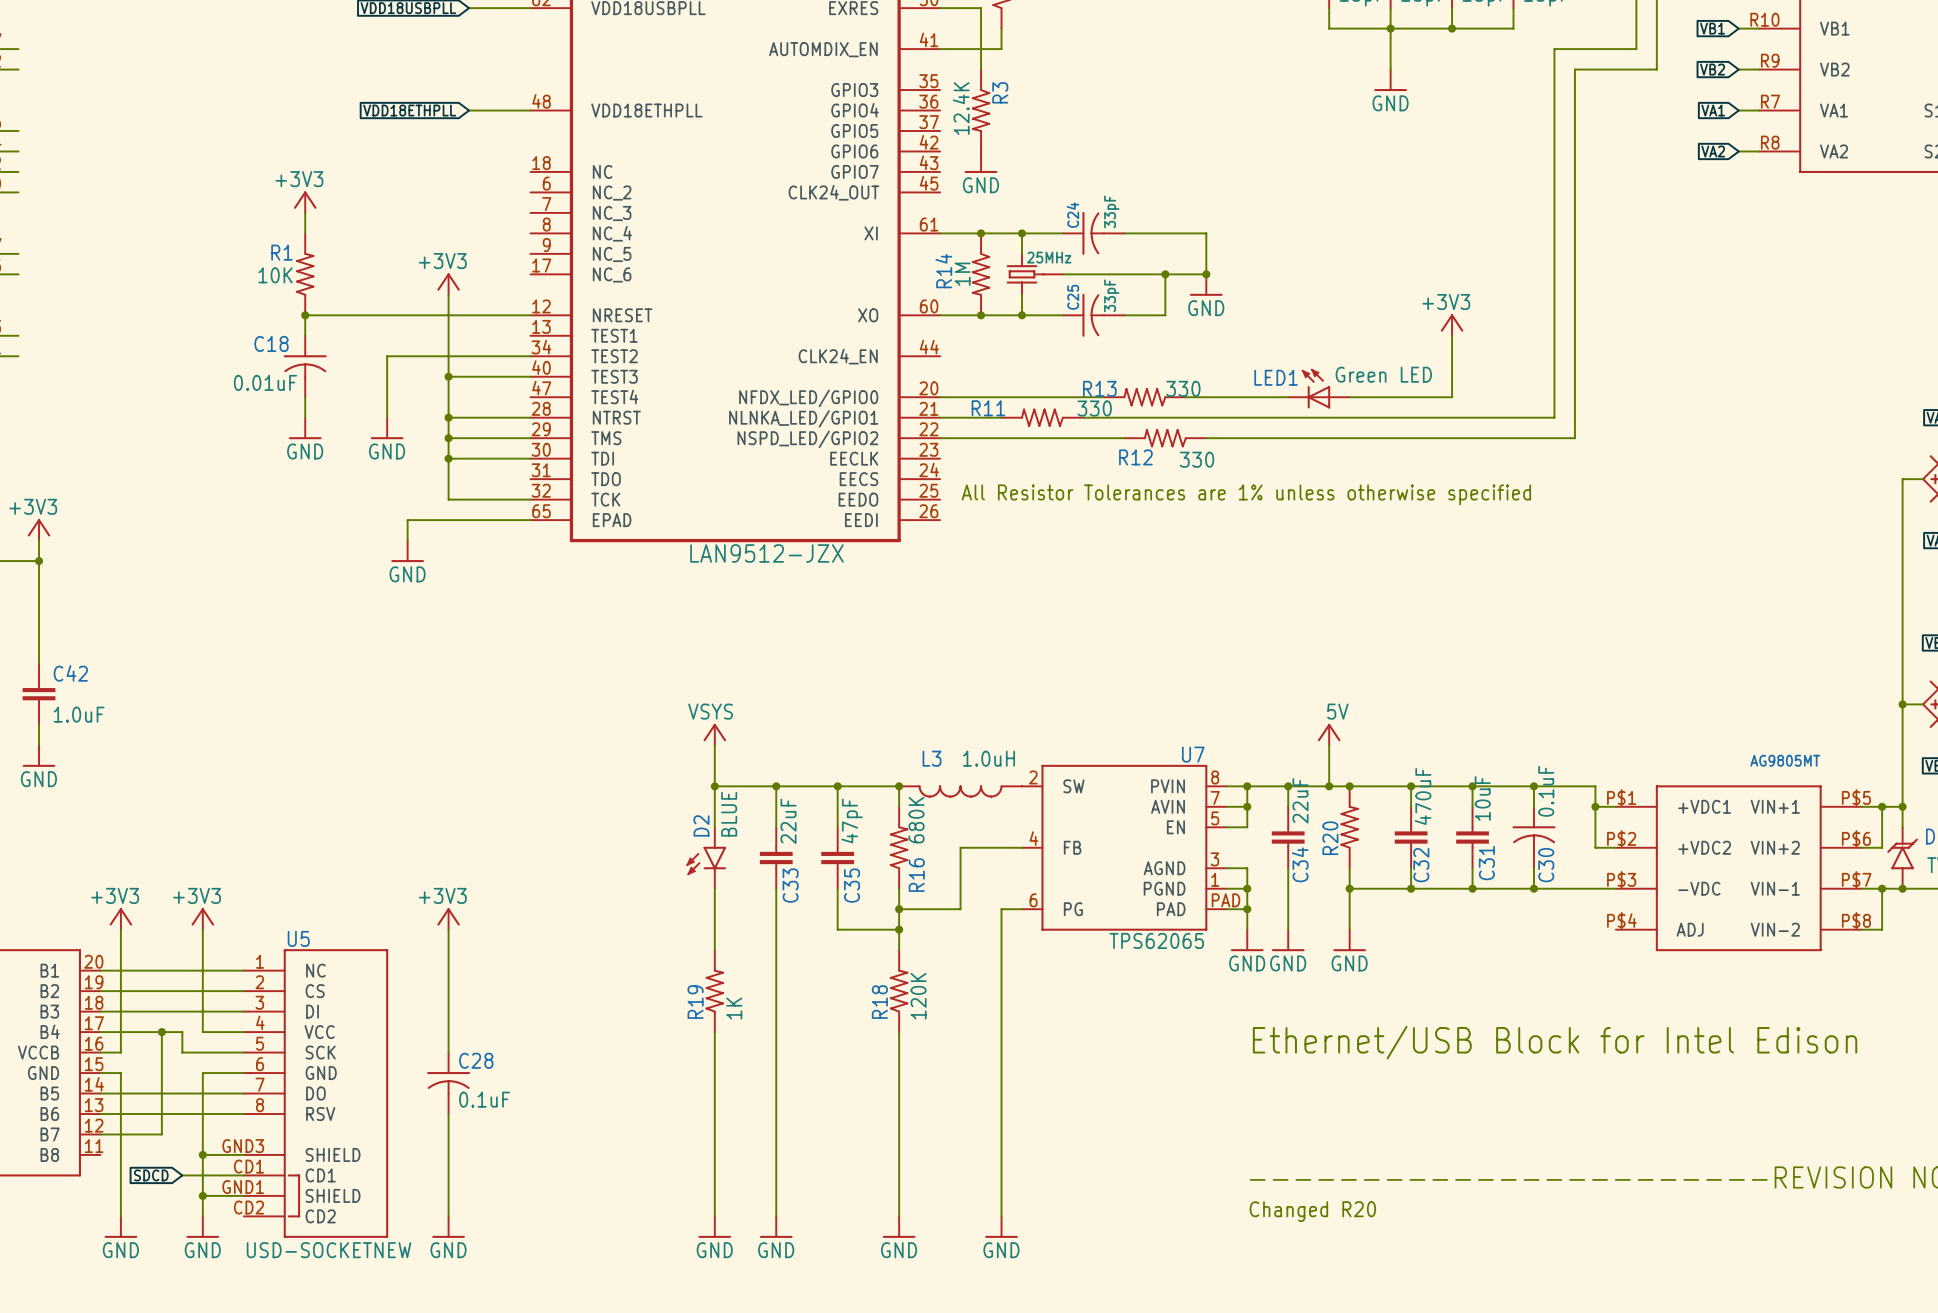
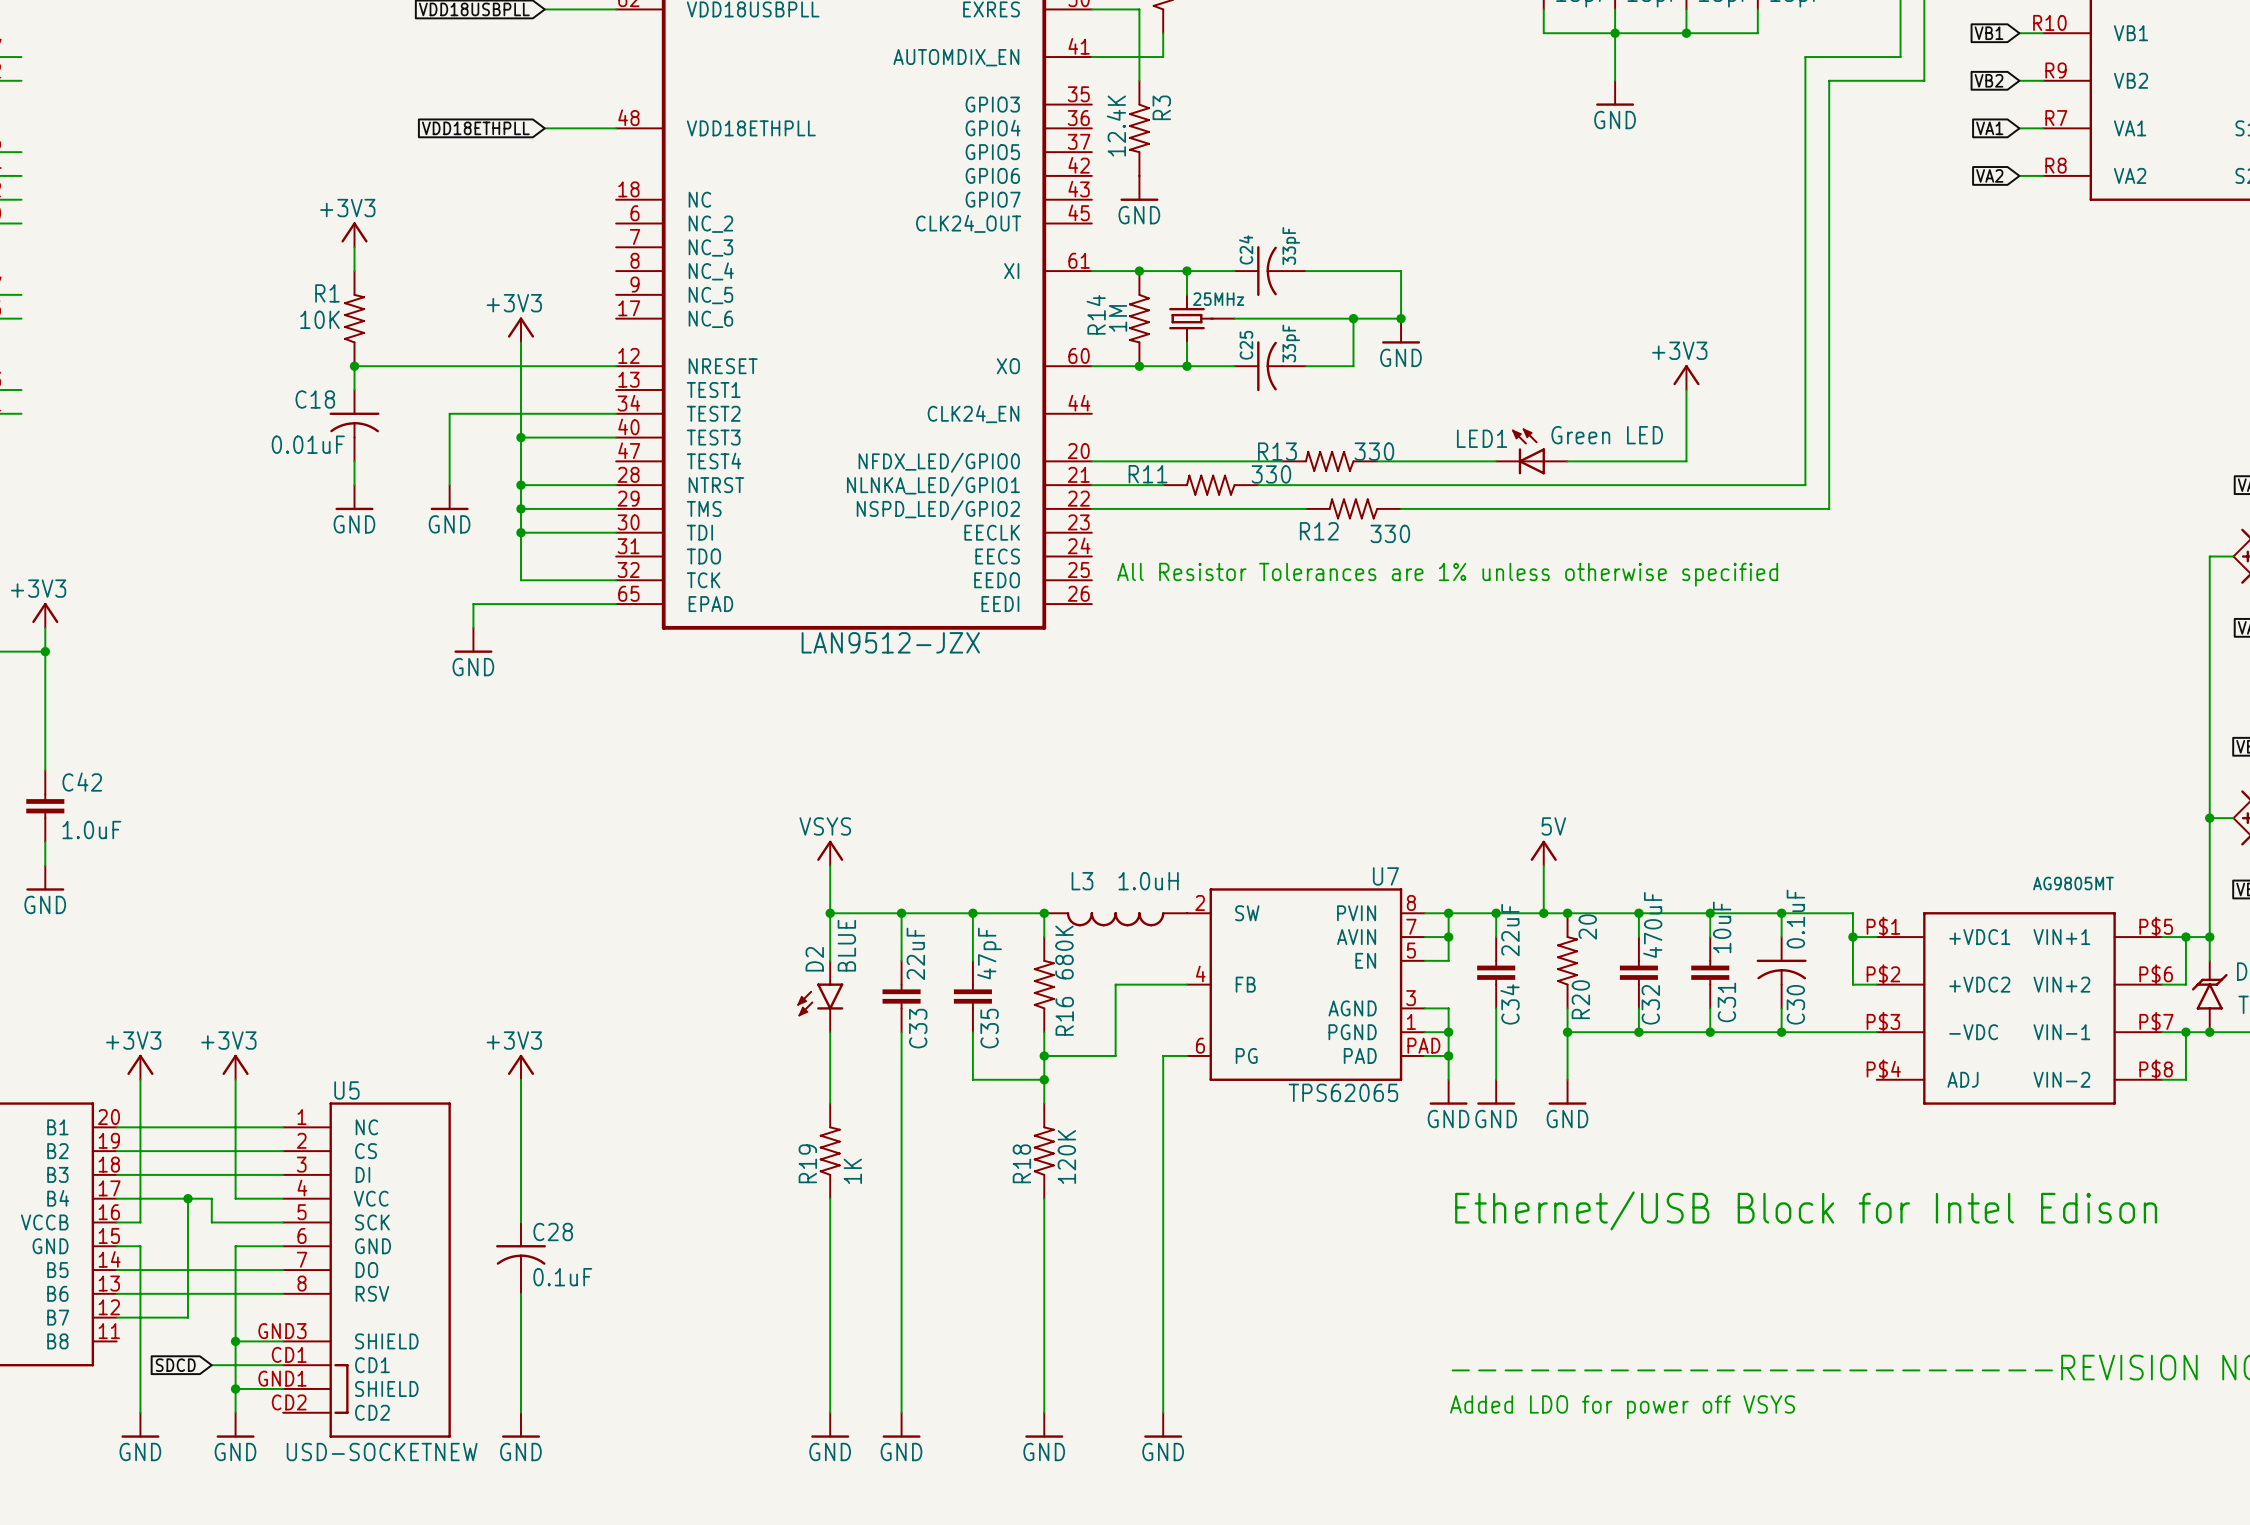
R20 value: none -> 20 (1587, 927)
R20 name position: R20 (1330, 838) -> R20 (1580, 999)
text: Changed R20 (1312, 1211) -> Added LDO for power off VSYS (1622, 1407)

